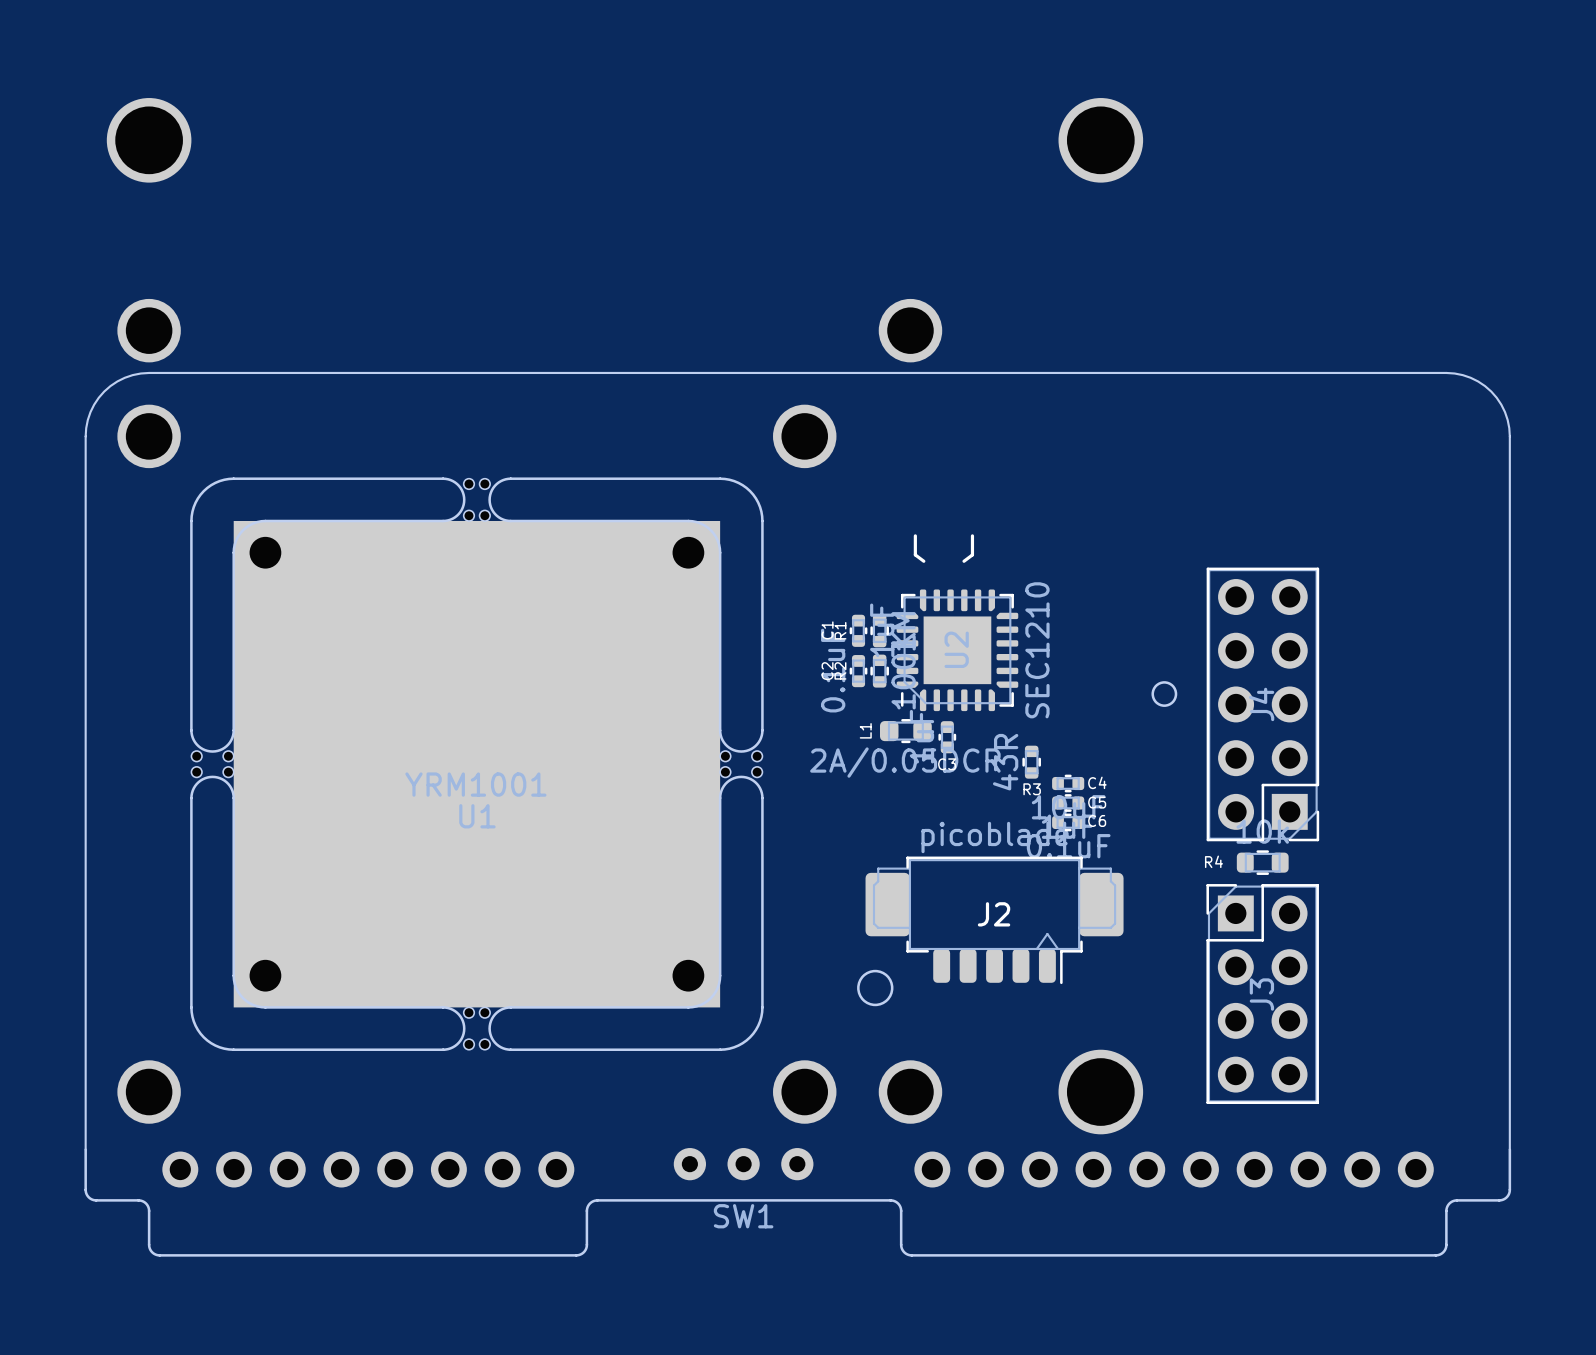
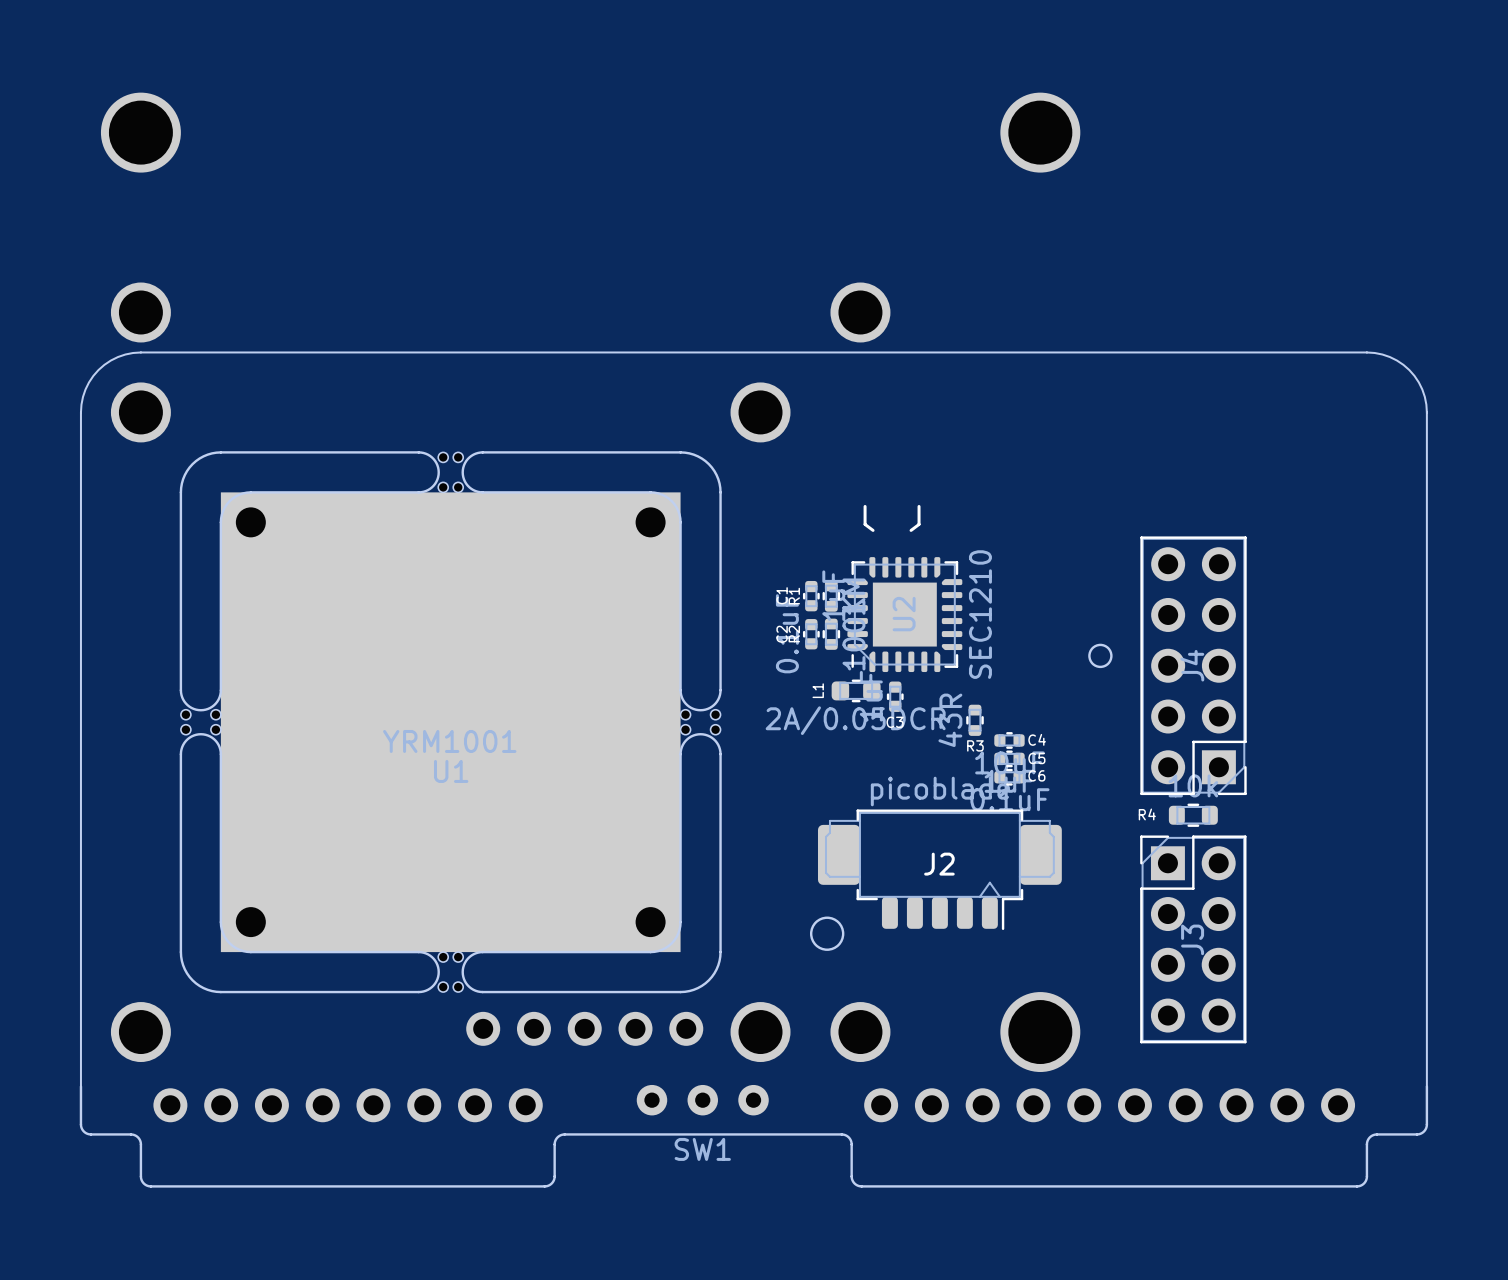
part footprint: [106, 98, 1144, 1135] -> [100, 92, 1081, 1073]

